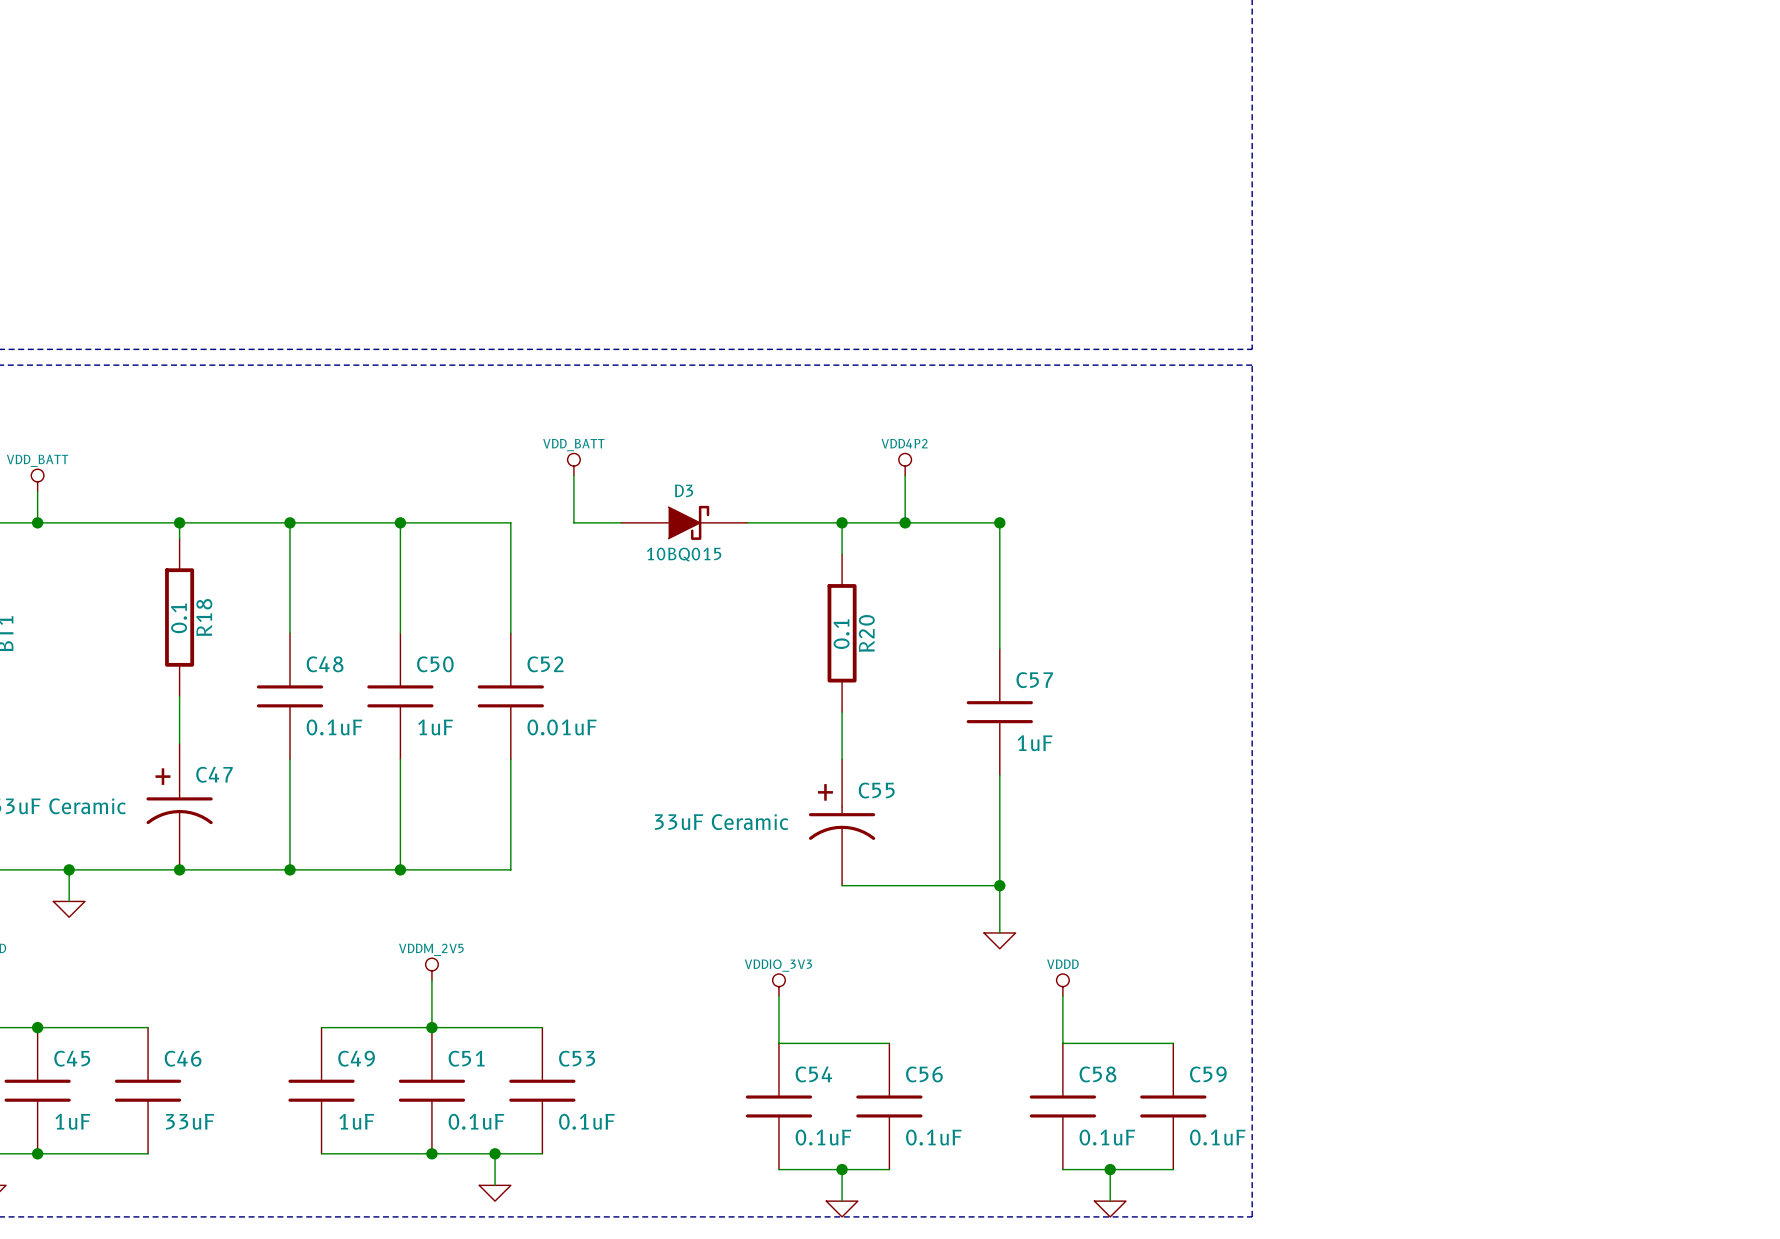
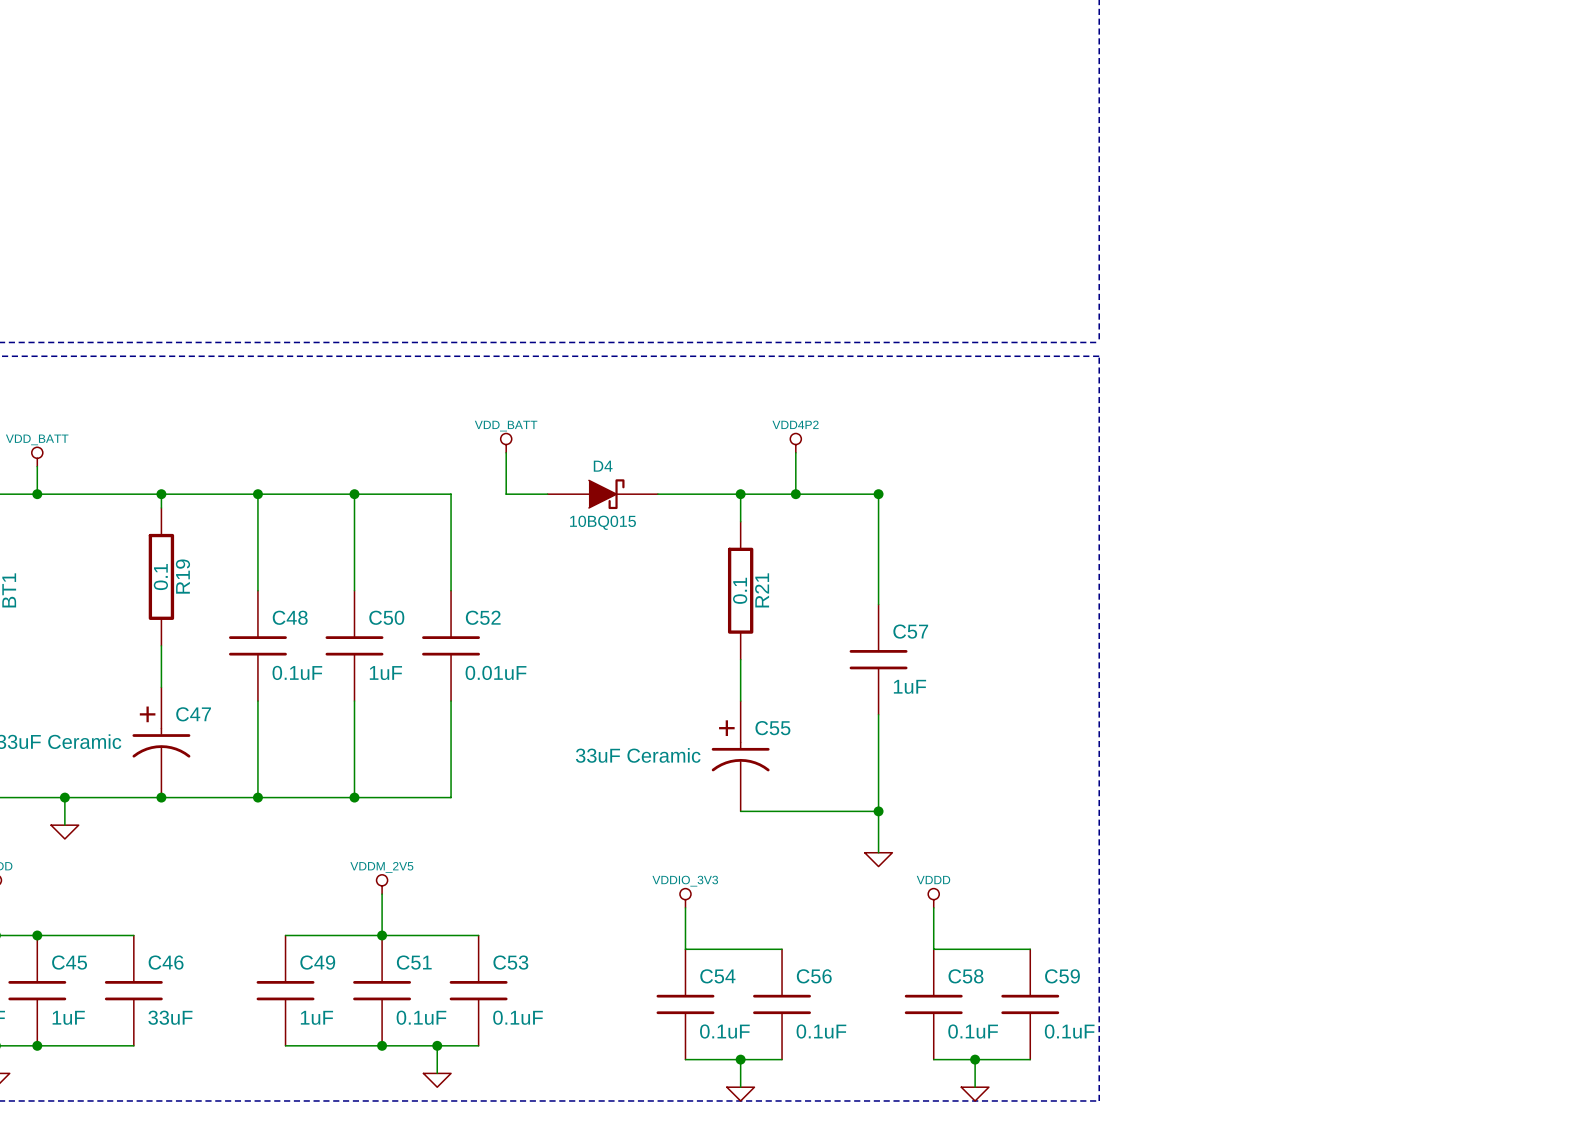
D3 name: D3 (684, 490) -> D4 (603, 466)
R18 name: R18 (204, 617) -> R19 (182, 576)
R20 name: R20 (866, 633) -> R21 (762, 590)

